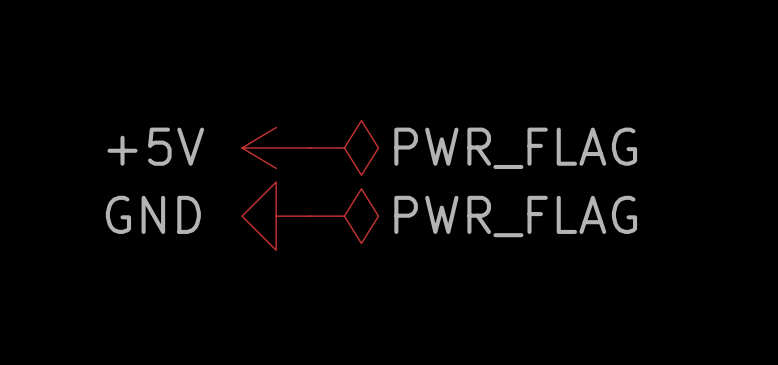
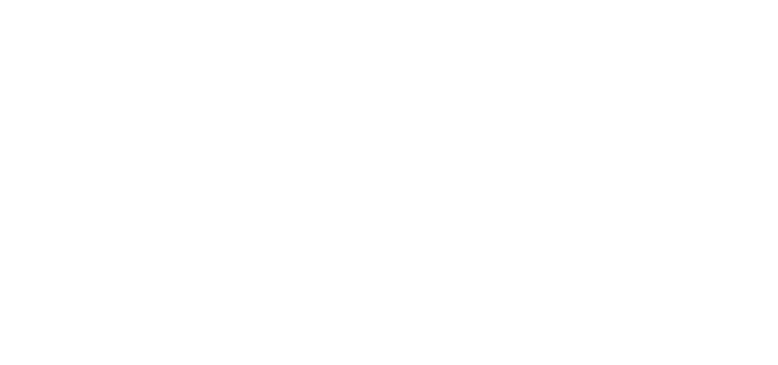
power symbol: +5V (276, 147) -> none
power symbol: PWR_FLAG (344, 147) -> none
power symbol: GND (276, 216) -> none
power symbol: PWR_FLAG (344, 216) -> none

